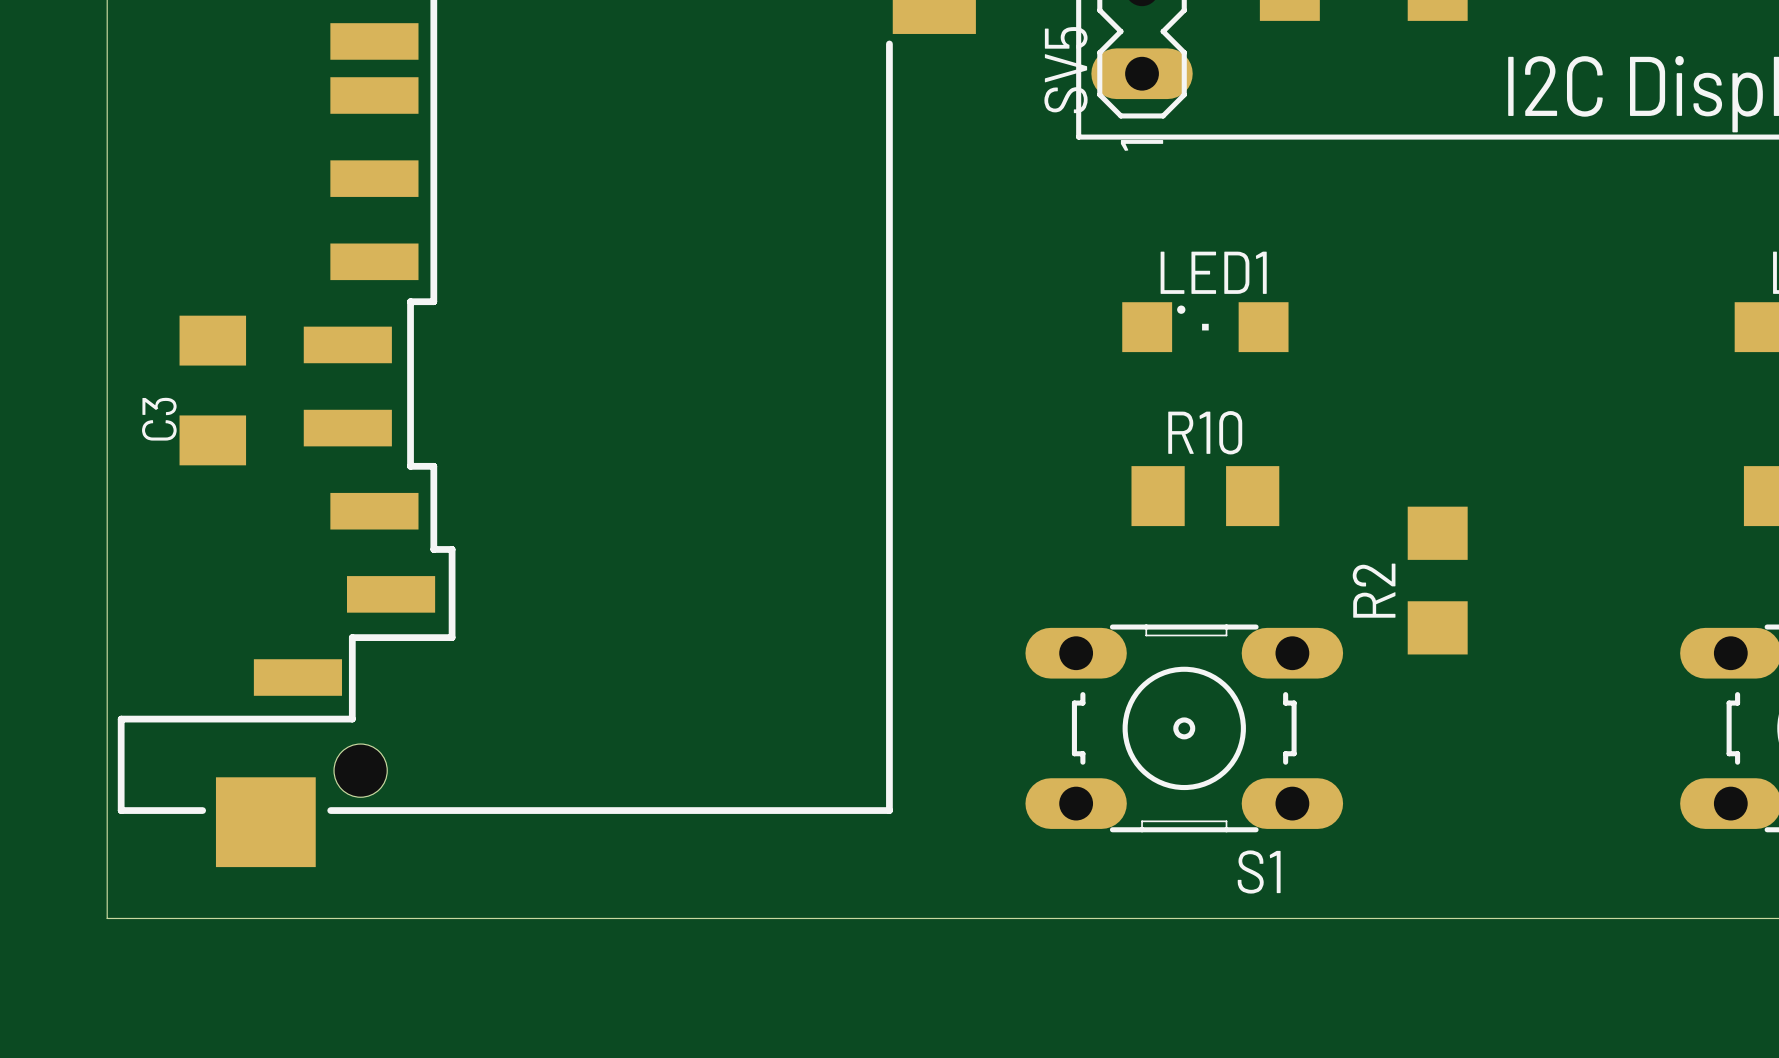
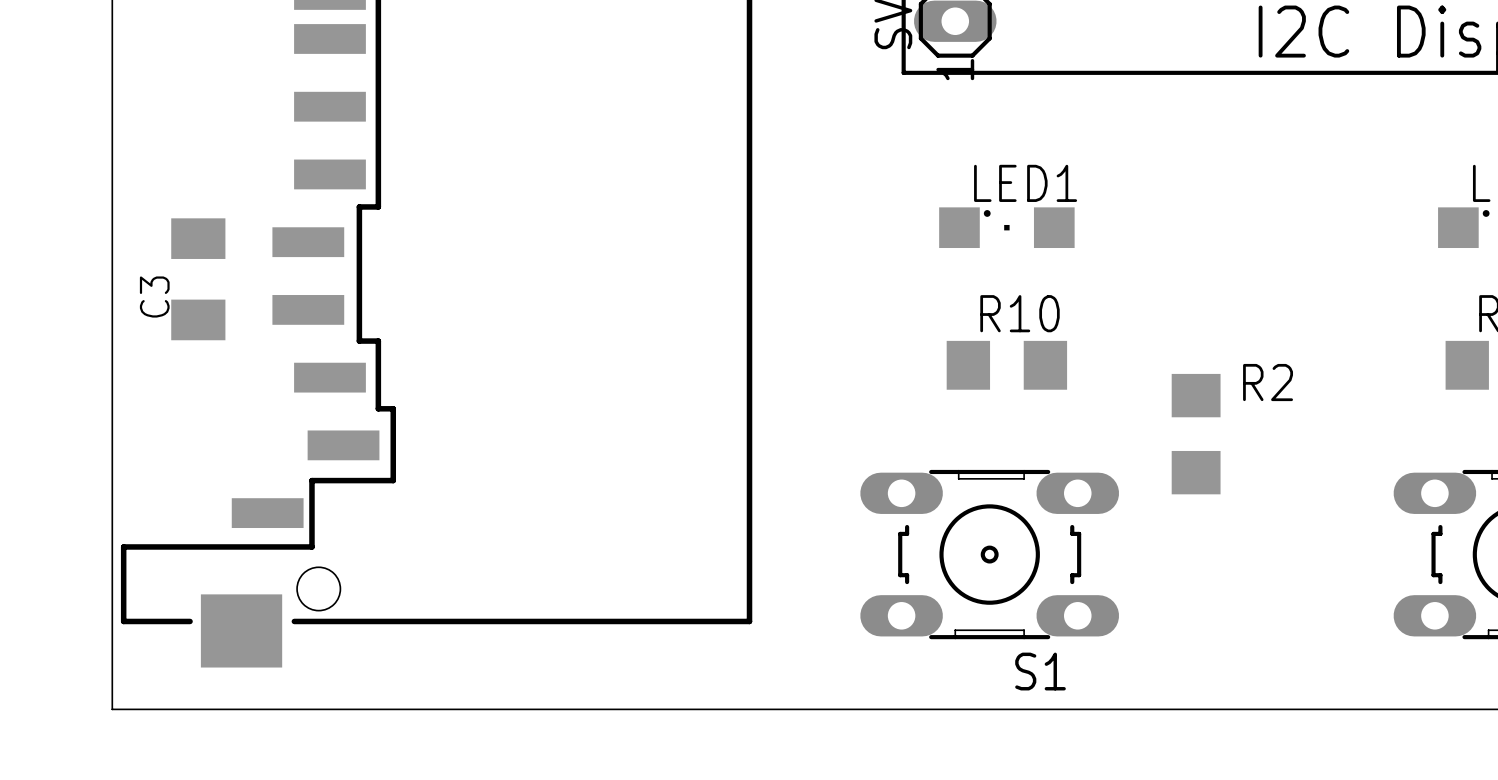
R2 name rotation: 0° (1374, 590) -> 90° clockwise (1268, 382)
R2 name position: R2 (1374, 590) -> R2 (1268, 382)

